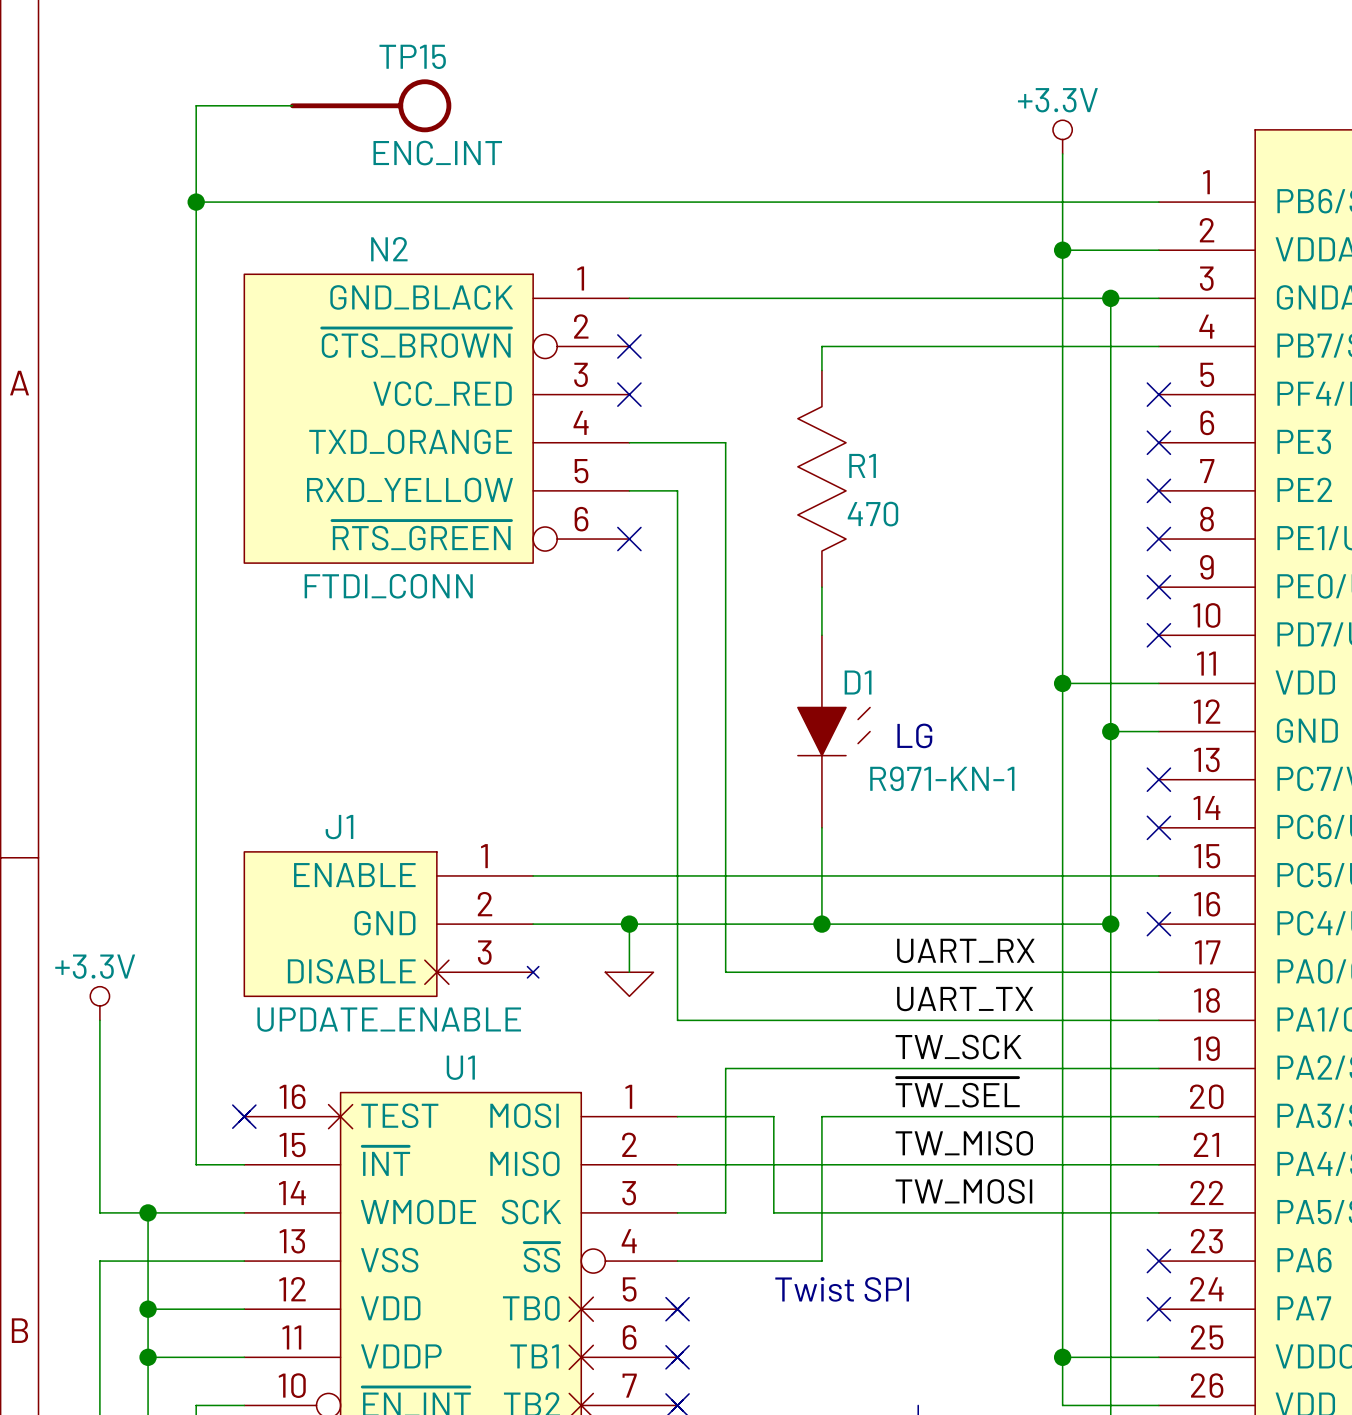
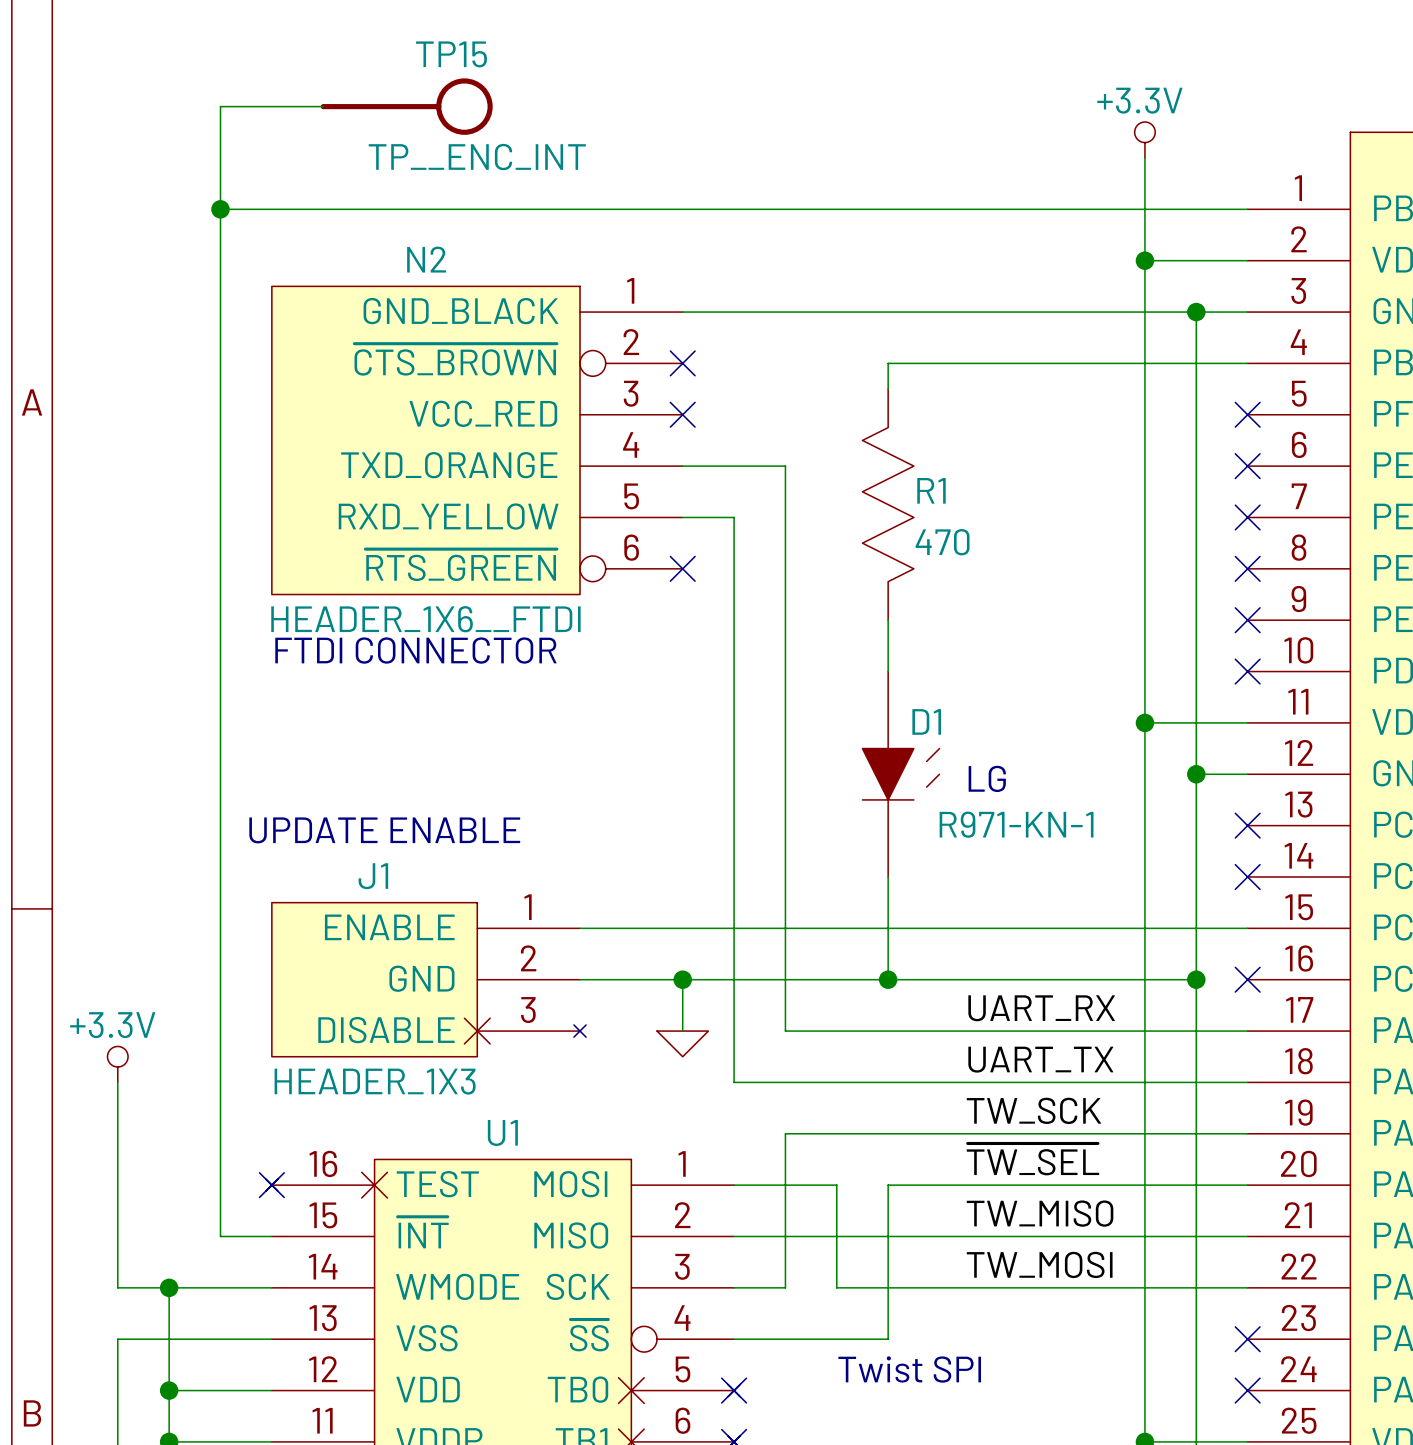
TP15 value: ENC_INT (437, 153) -> TP__ENC_INT (477, 157)
N2 value: FTDI_CONN (388, 586) -> HEADER_1X6__FTDI (425, 619)
text: none -> FTDI CONNECTOR (415, 650)
text: none -> UPDATE ENABLE (384, 830)
J1 value: UPDATE_ENABLE (389, 1019) -> HEADER_1X3 (375, 1081)

